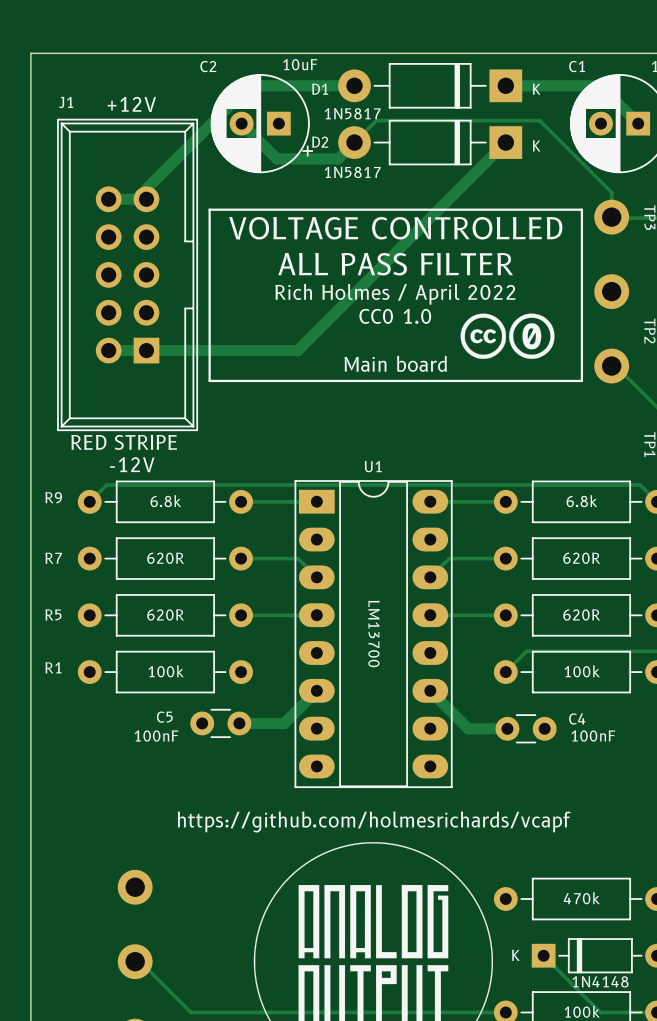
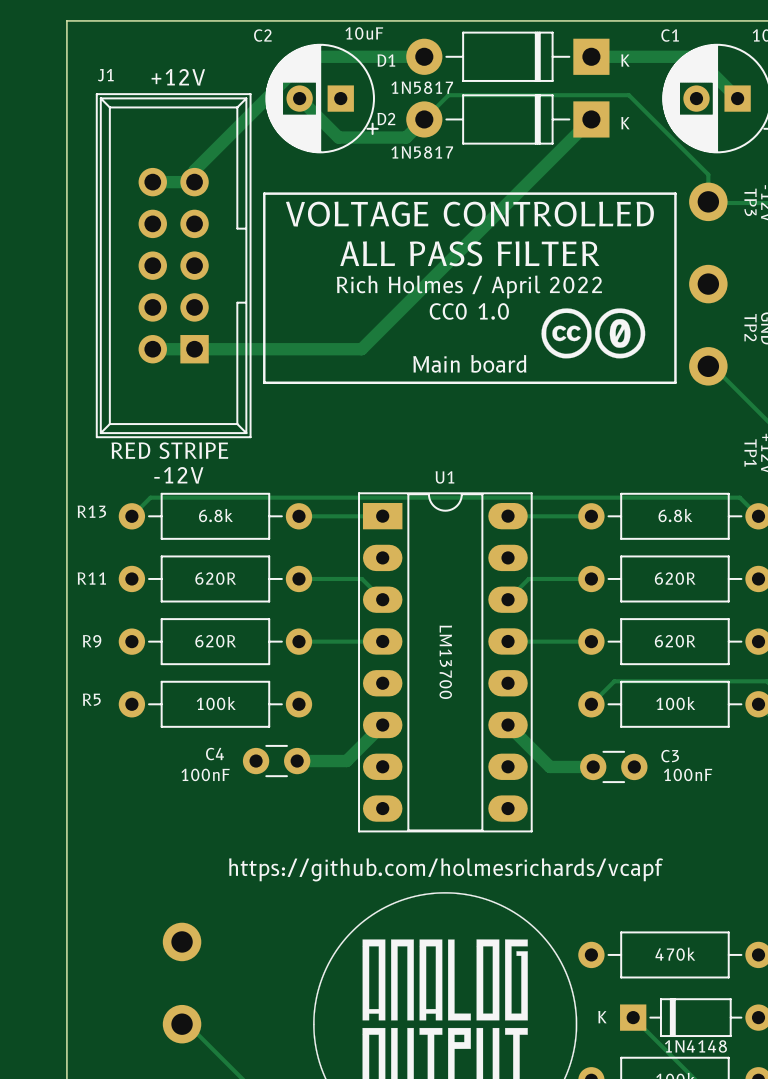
R9 name: R9 (53, 497) -> R13 (91, 511)
R7 name: R7 (53, 558) -> R11 (91, 578)
R5 name: R5 (53, 614) -> R9 (92, 641)
R1 name: R1 (53, 667) -> R5 (91, 699)
C5 name: C5 (164, 717) -> C4 (214, 754)
C4 name: C4 (577, 718) -> C3 (670, 756)

